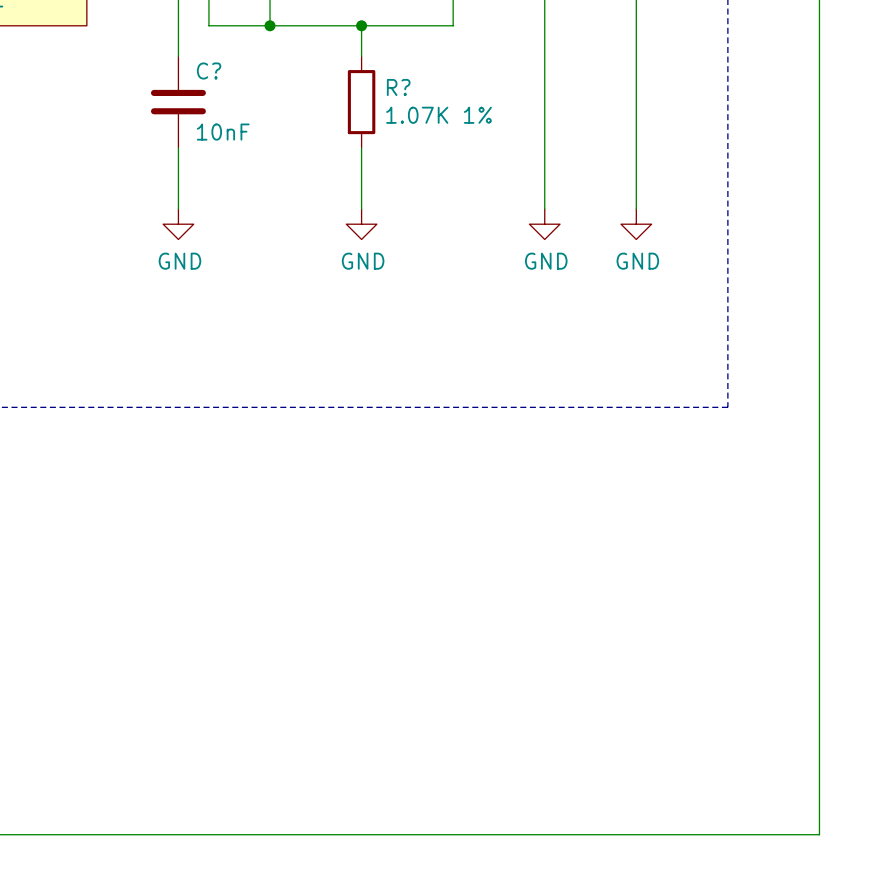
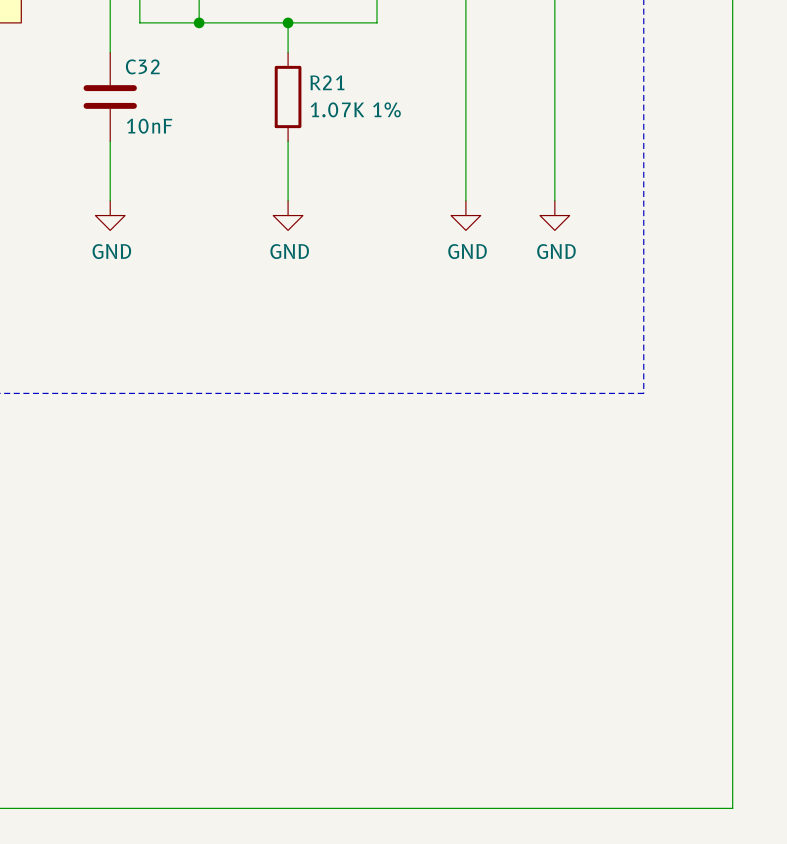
C? name: C? (209, 71) -> C32 (142, 66)
R? name: R? (398, 87) -> R21 (327, 82)

